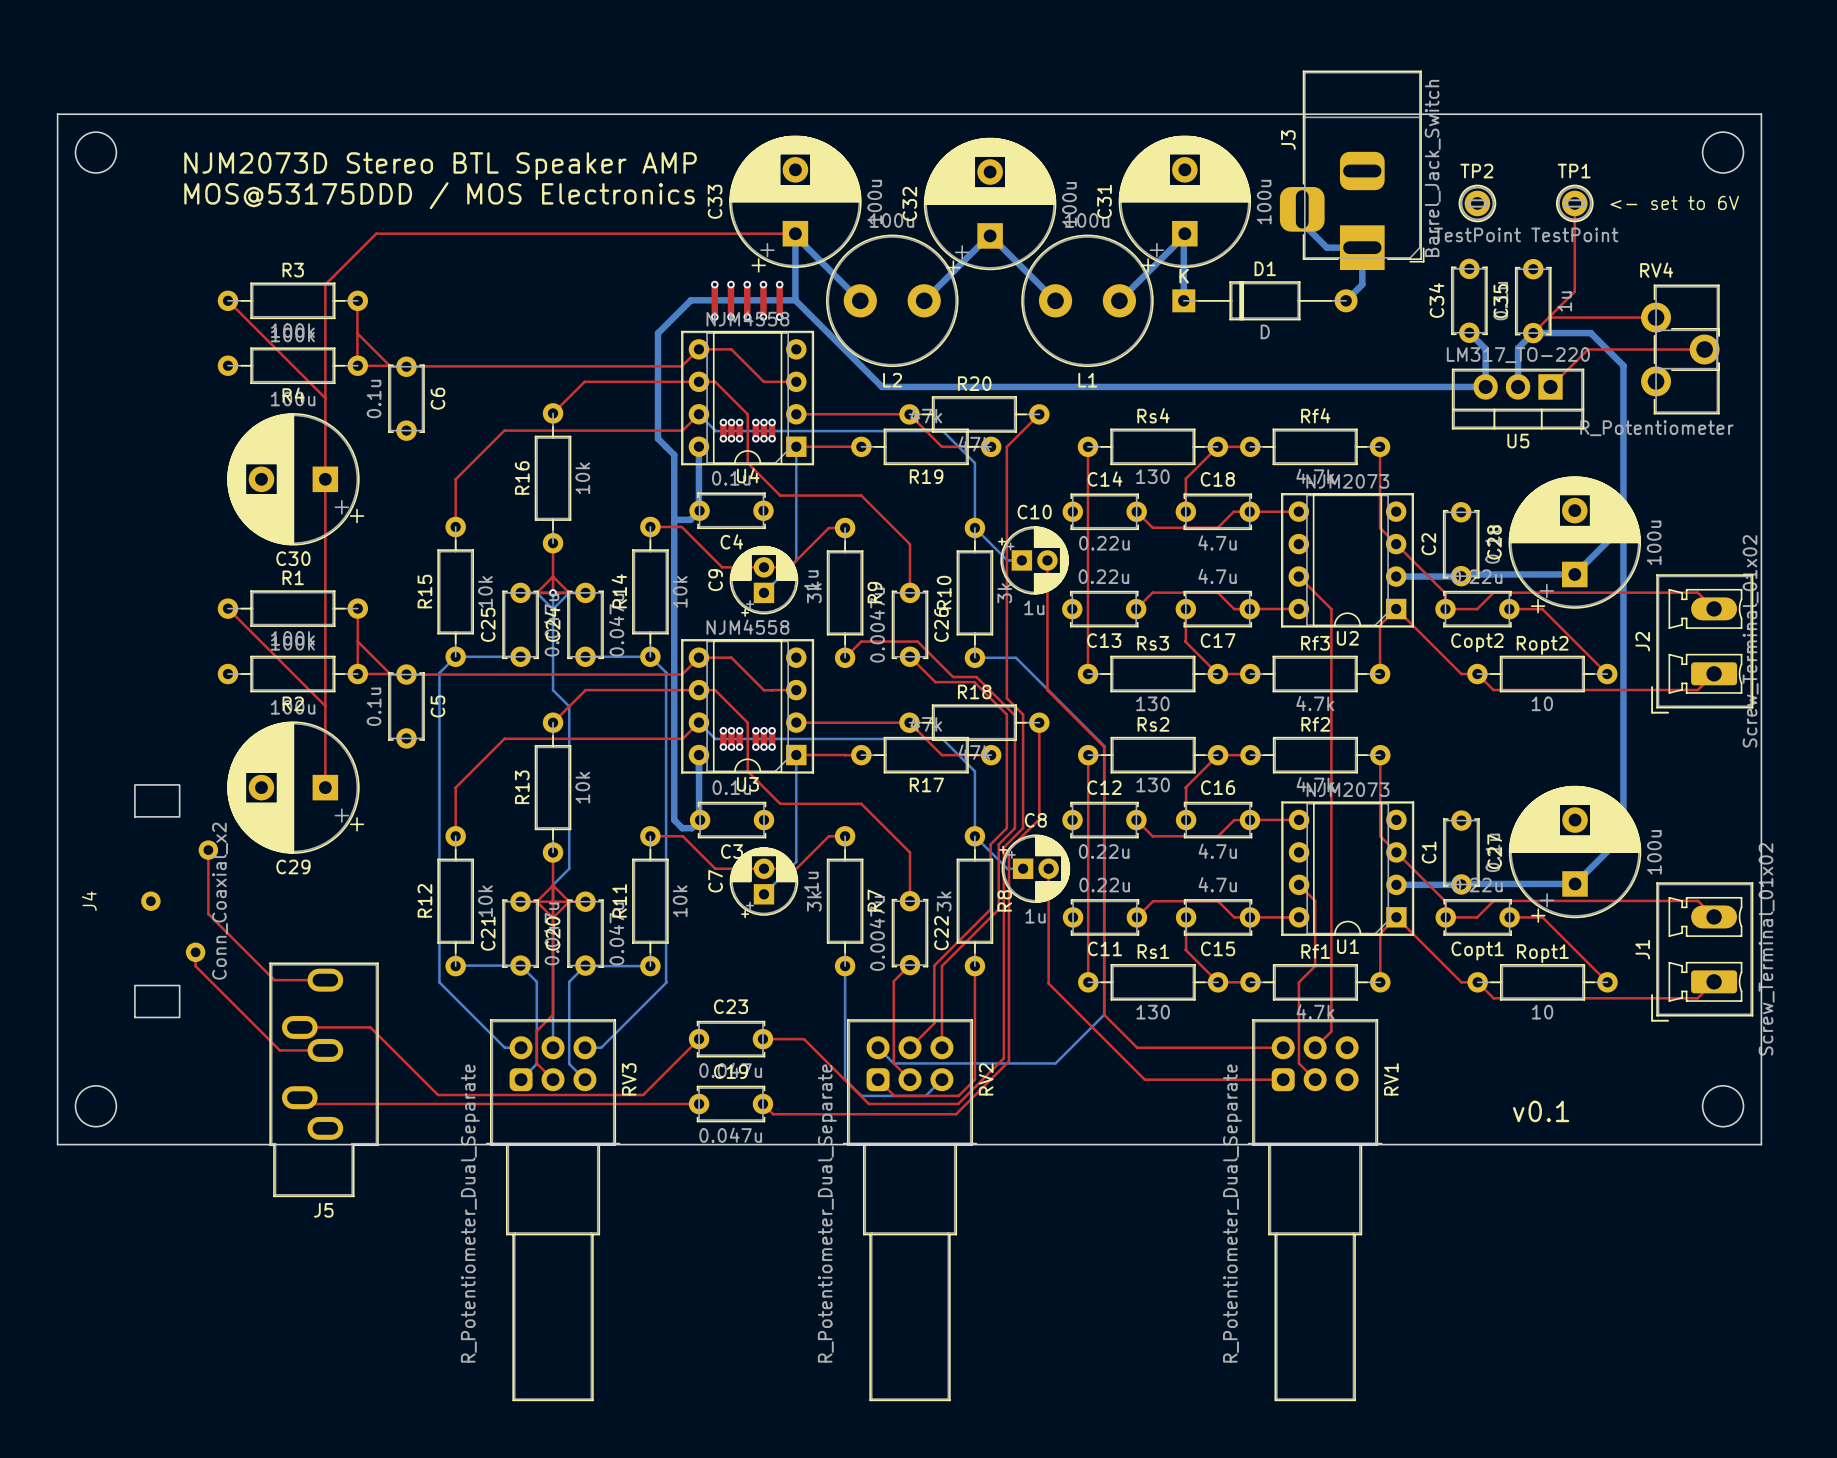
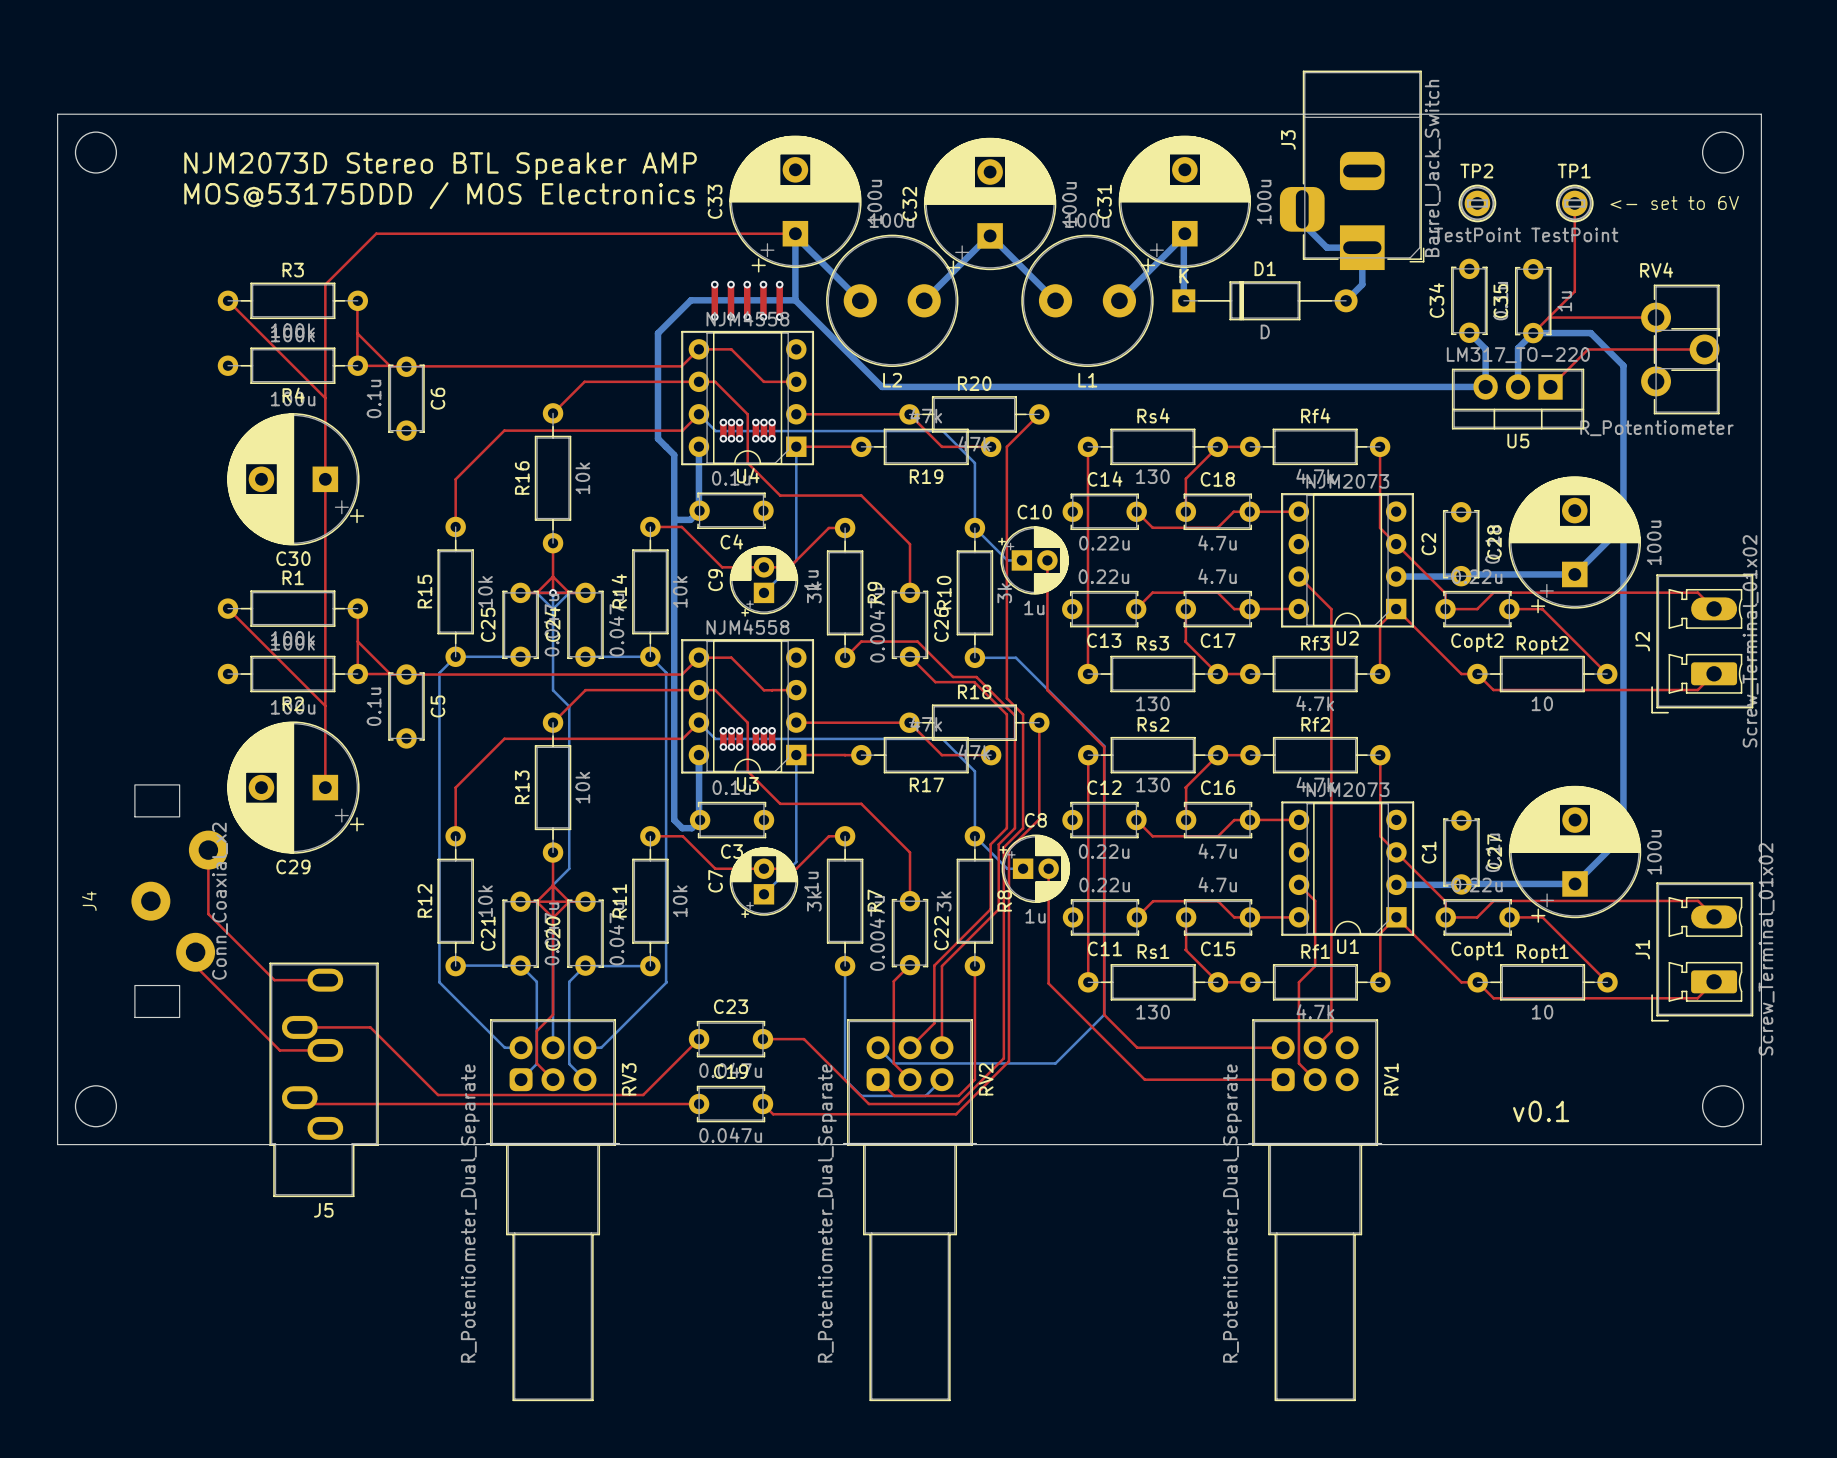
J4 footprint: [134, 784, 219, 1018] -> [131, 784, 228, 1018]

